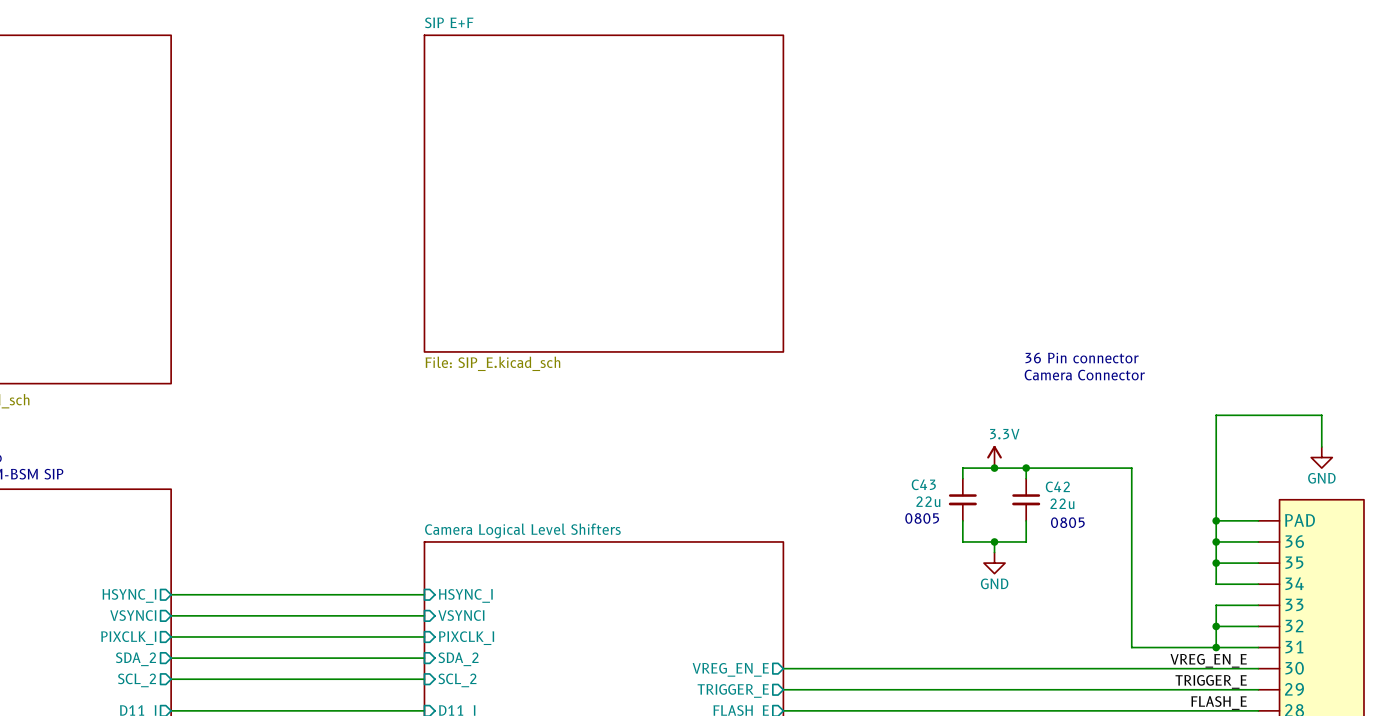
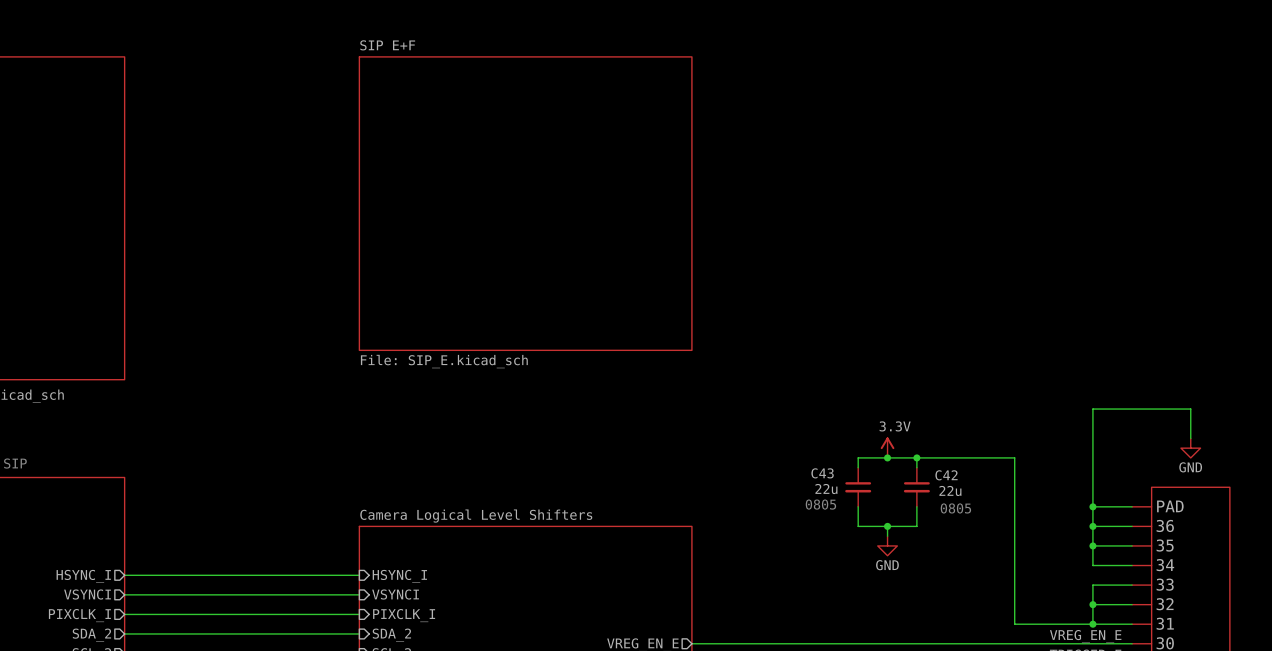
text: 36 Pin connector (1082, 358) -> none
text: Camera Connector (1084, 375) -> none

